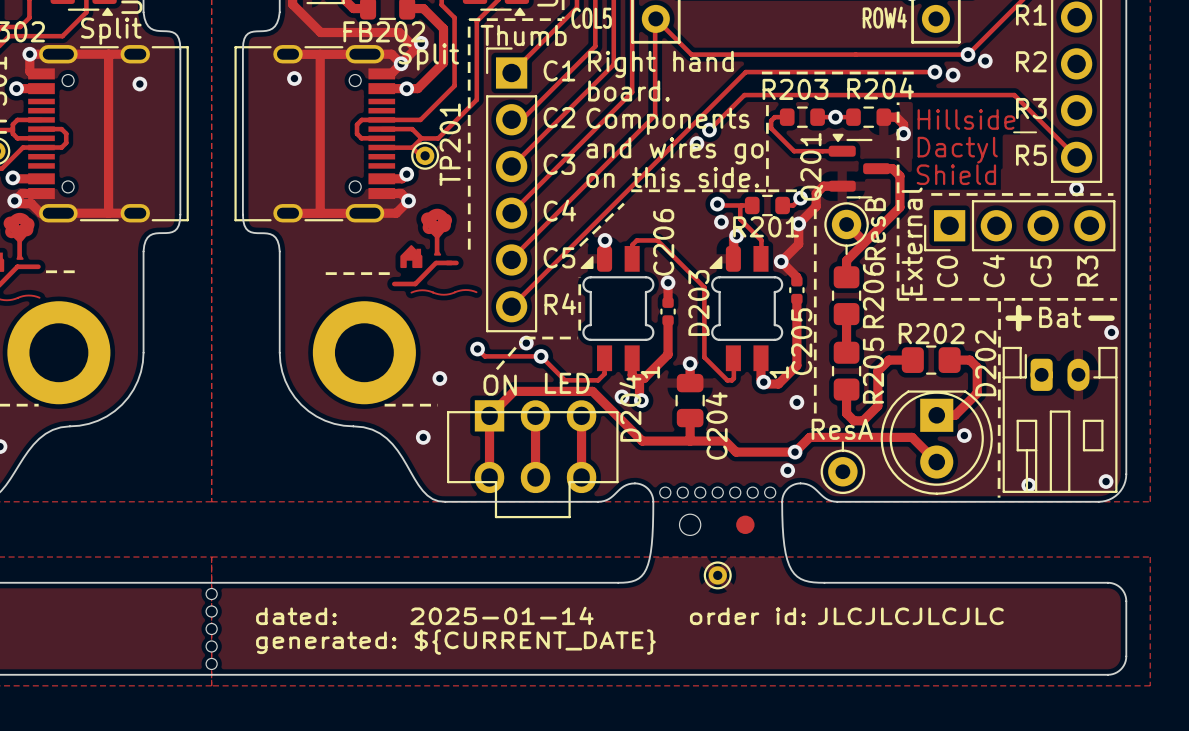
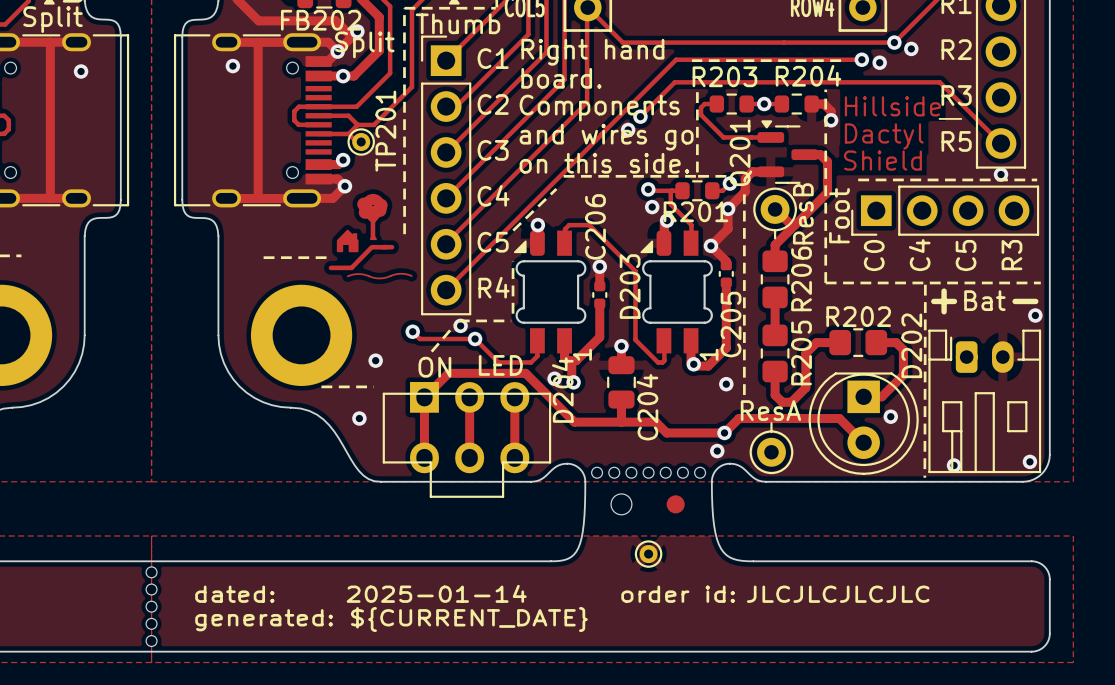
part value: External (912, 241) -> Foot (839, 215)

